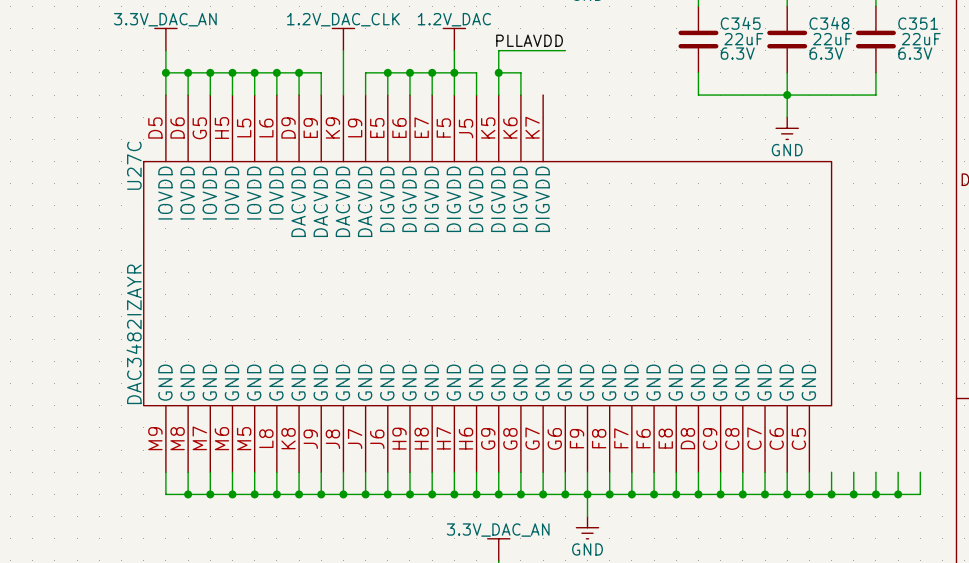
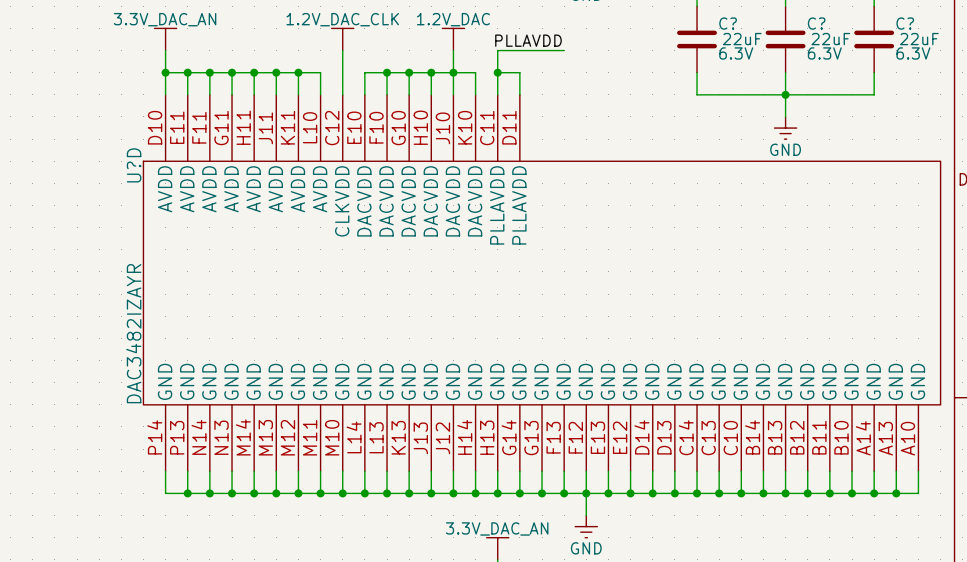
C345 name: C345 (740, 23) -> C? (728, 23)
C348 name: C348 (829, 23) -> C? (816, 23)
C351 name: C351 (918, 23) -> C? (905, 23)
U27C: DAC3482IZAYR (487, 283) -> none
U?D: none -> DAC3482IZAYR (542, 283)

